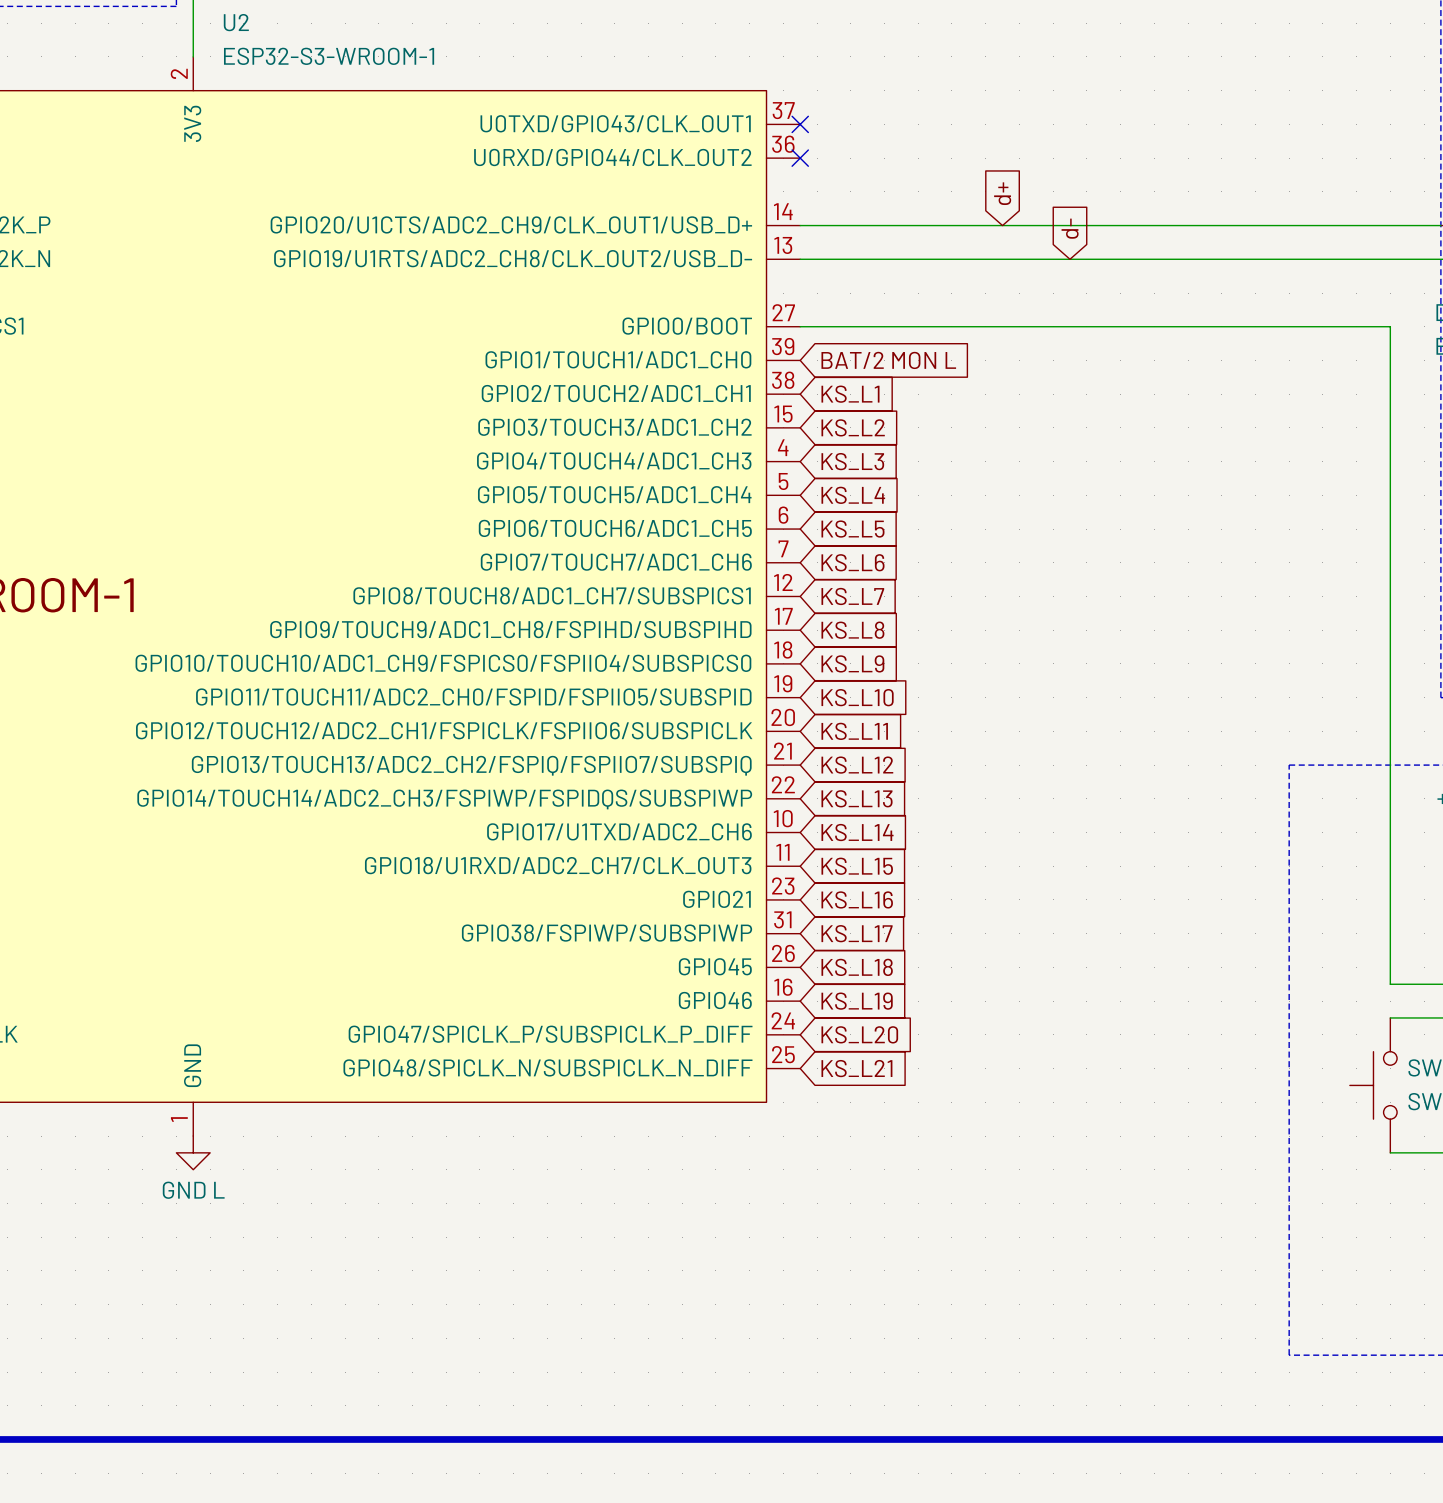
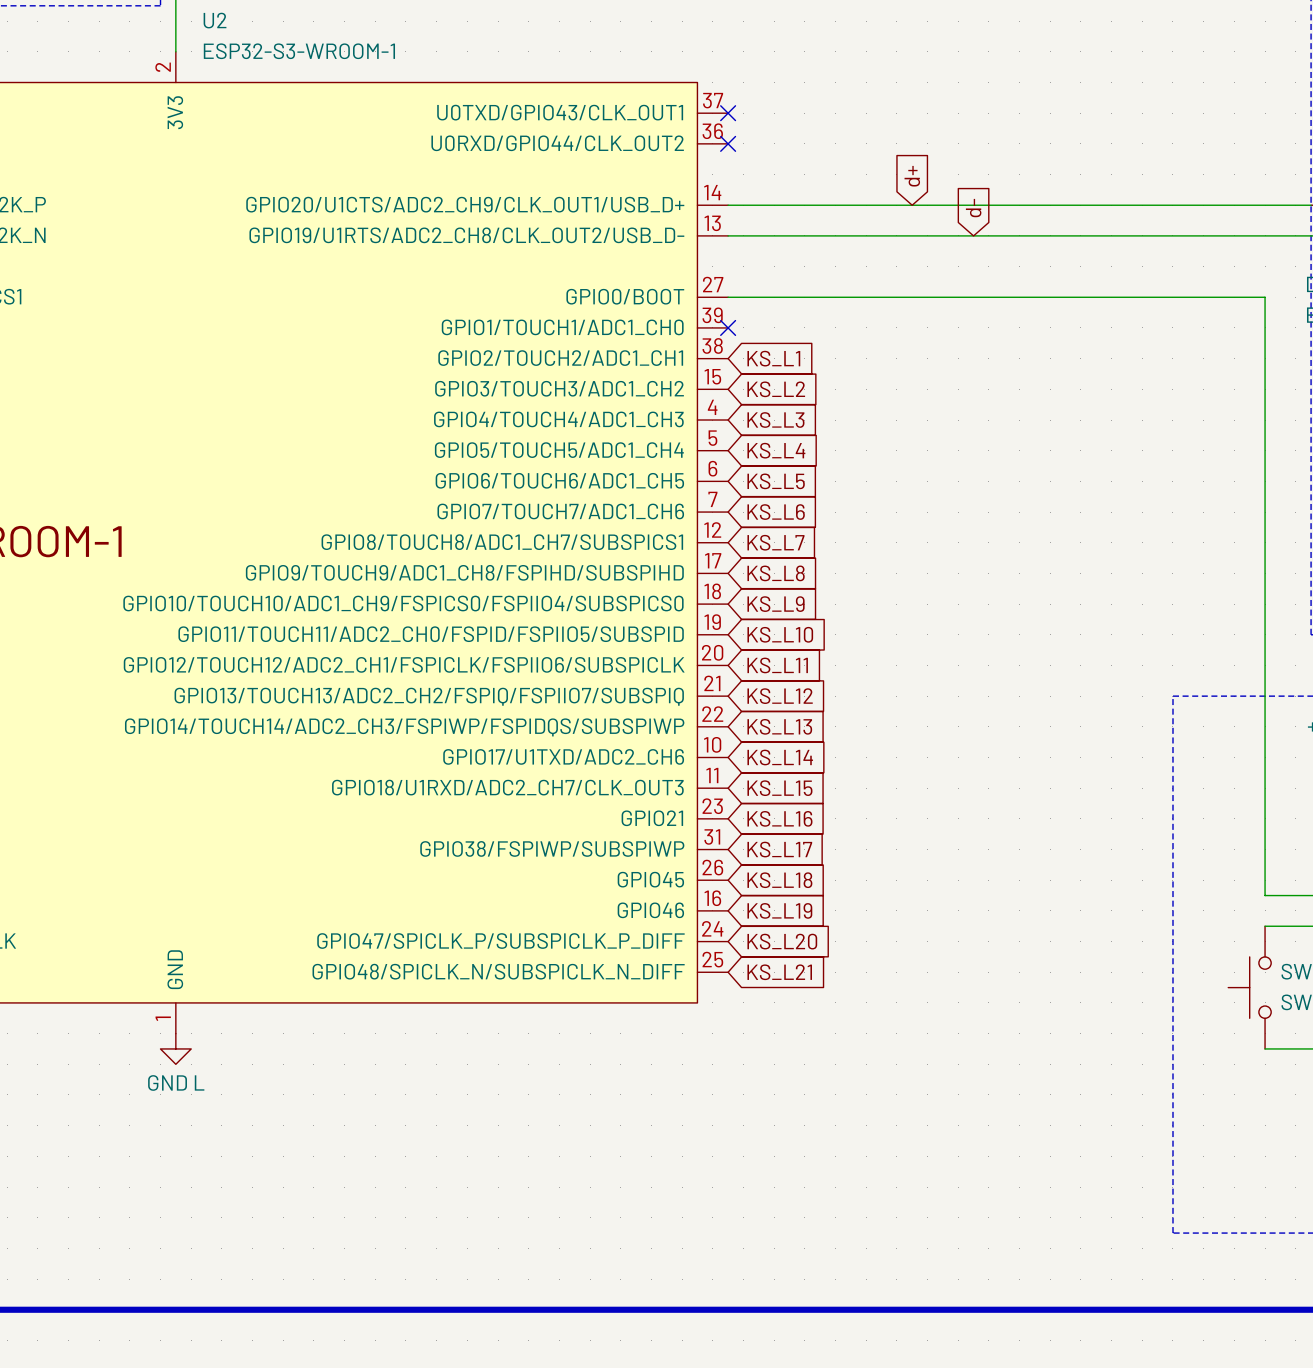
no-connect mark: none -> (728, 327)
global label: BAT/2 MON L (888, 360) -> none

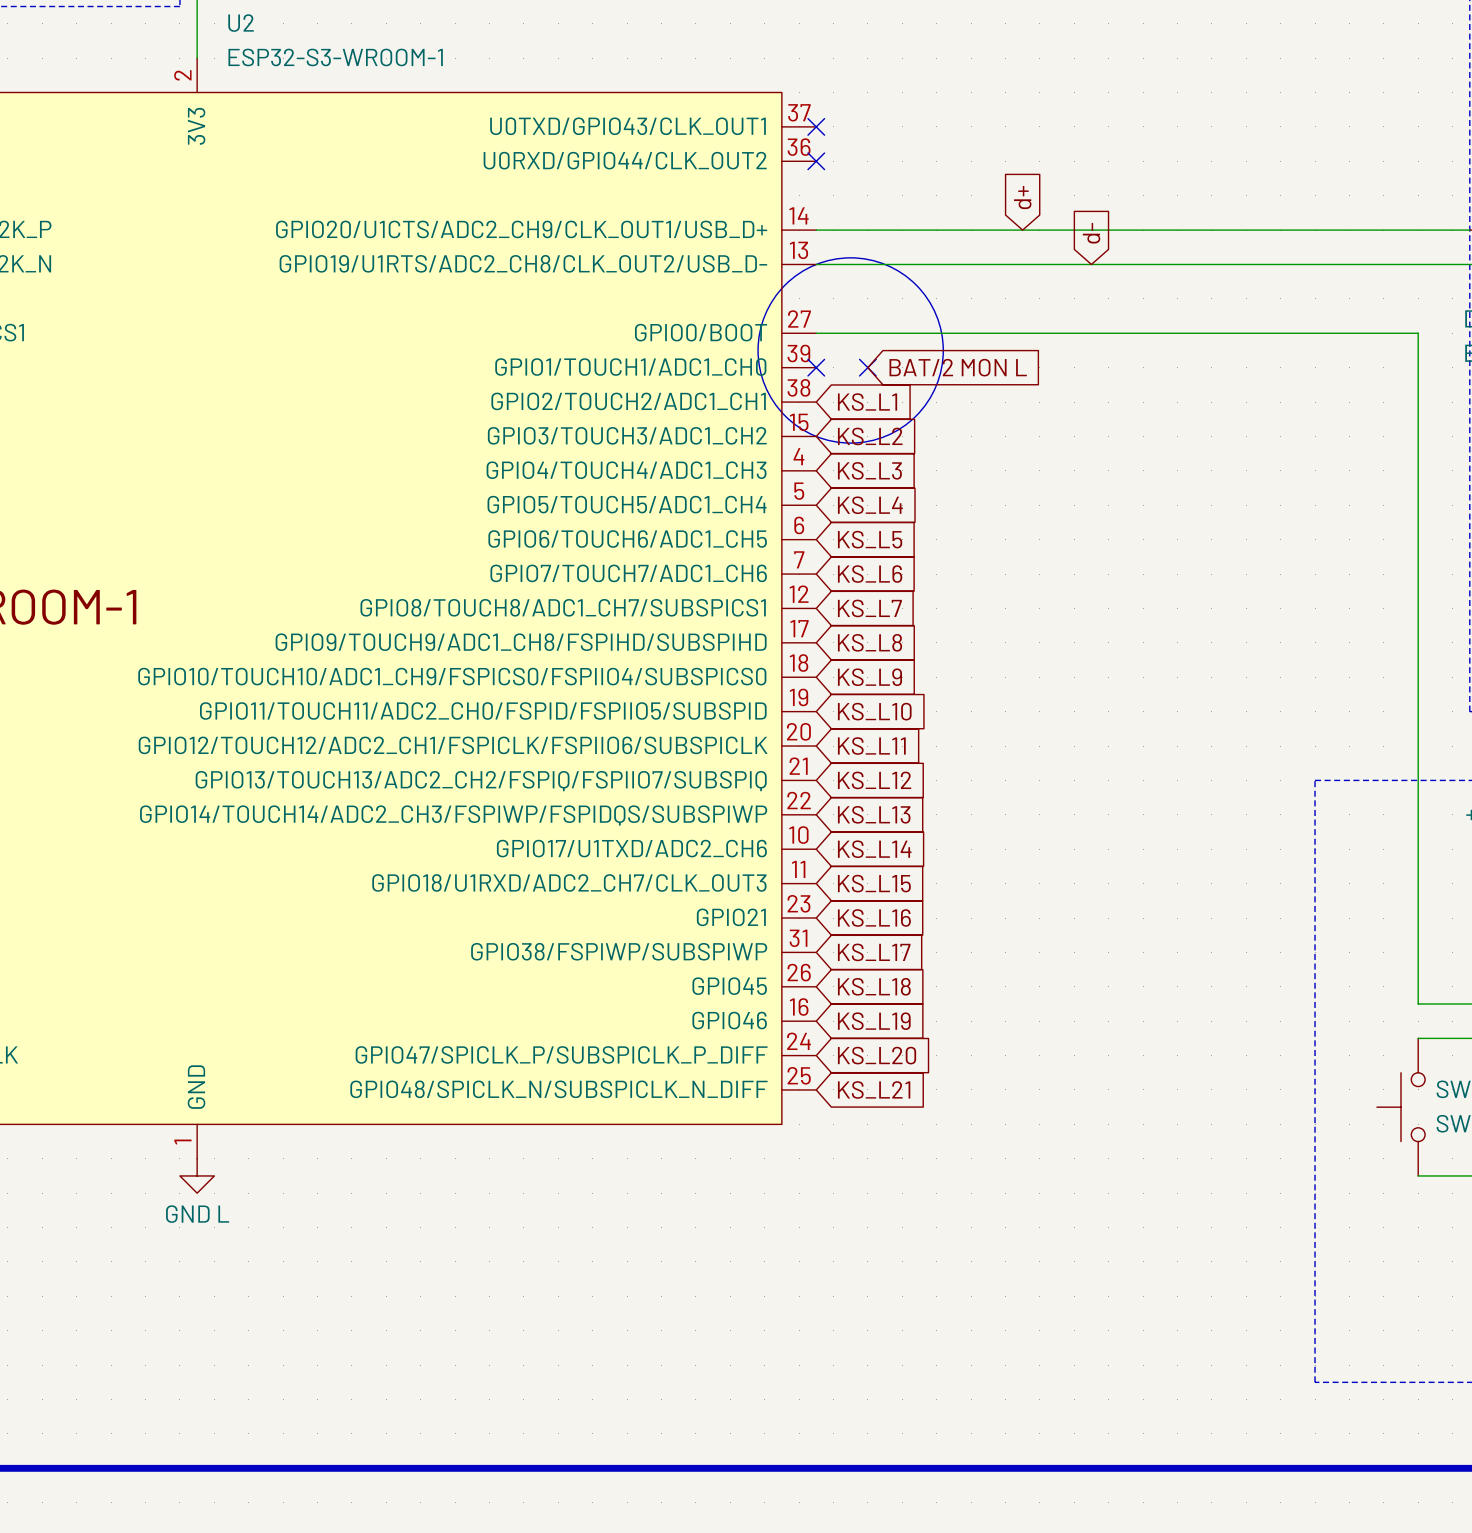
drawing: none -> [758, 257, 944, 444]
no-connect mark: none -> (867, 367)
global label: none -> BAT/2 MON L (958, 367)

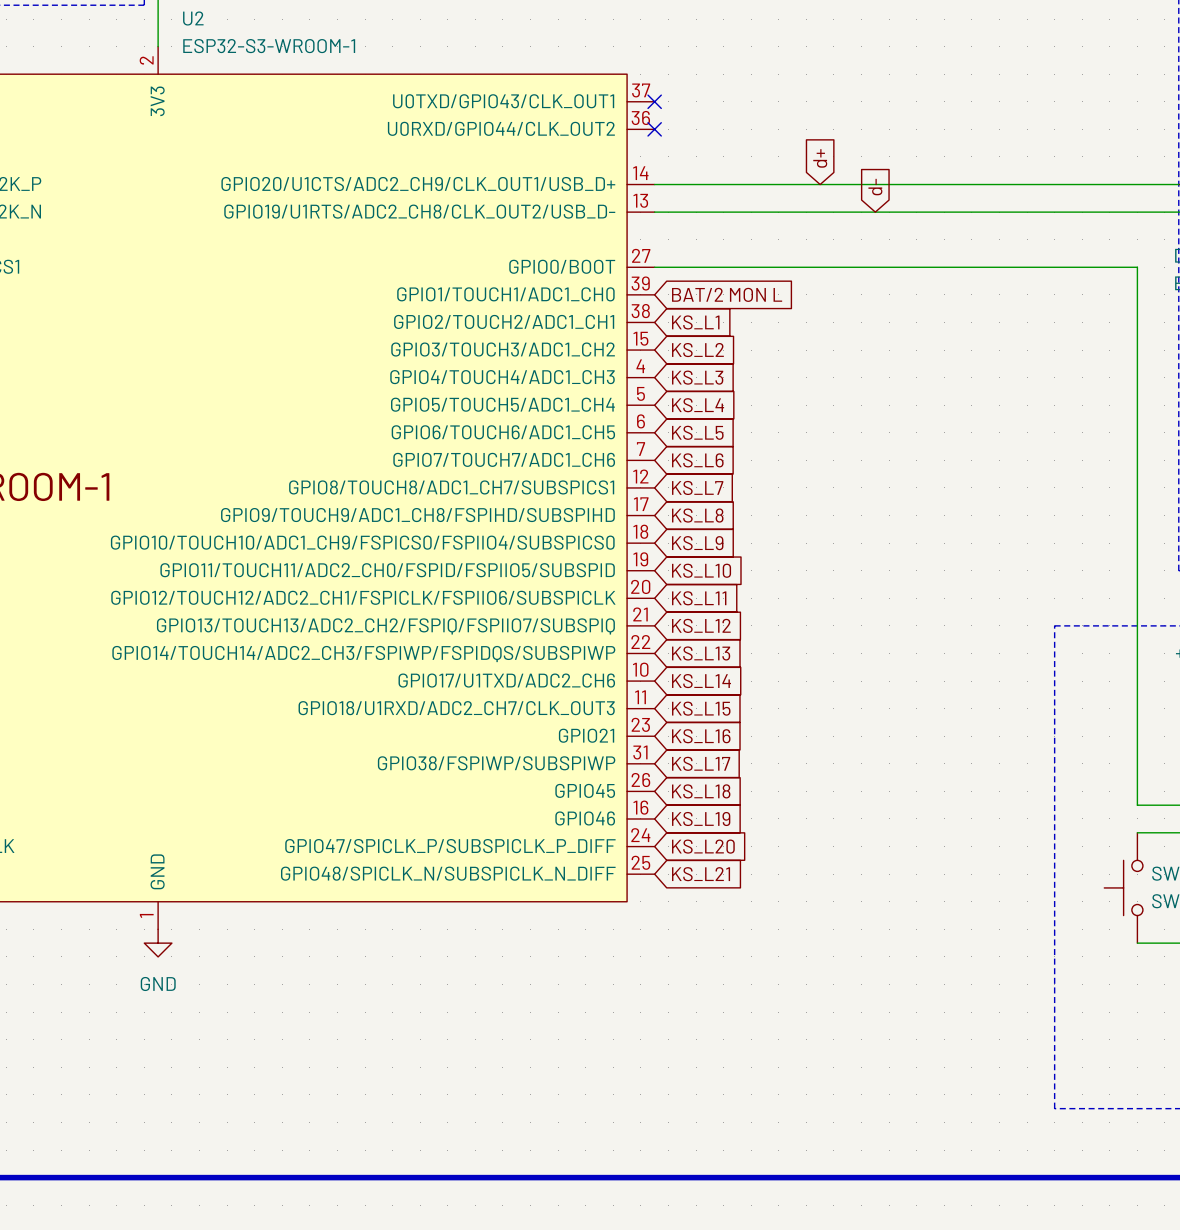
drawing: [758, 257, 944, 444] -> none
no-connect mark: (816, 367) -> none
no-connect mark: (867, 367) -> none
global label position: BAT/2 MON L (958, 367) -> BAT/2 MON L (727, 294)
power symbol: GND L (197, 1175) -> GND (158, 943)

